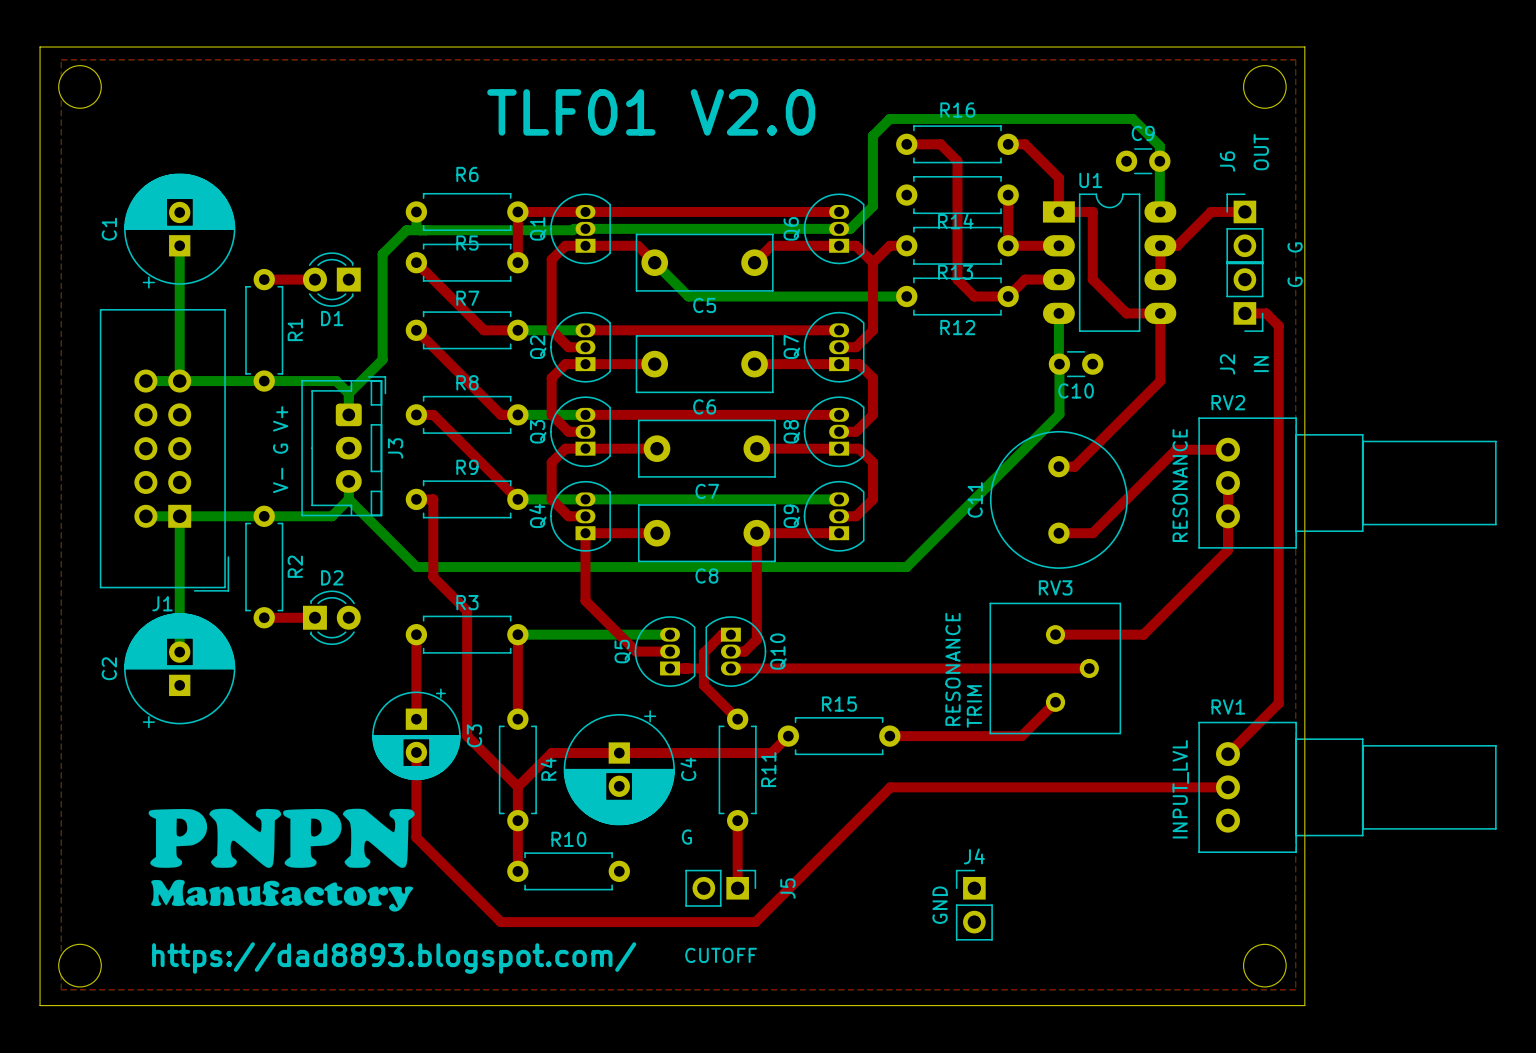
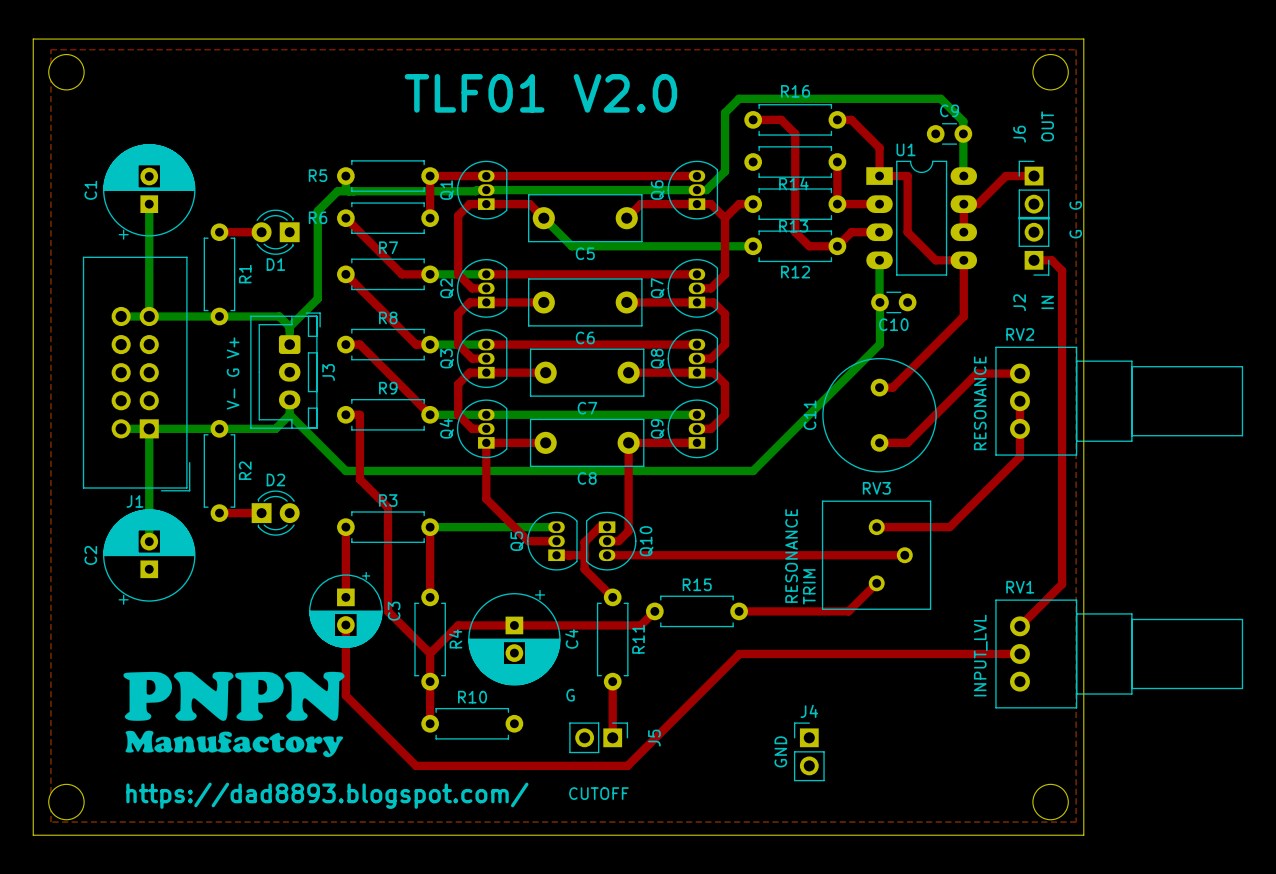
R6 name position: R6 (467, 174) -> R6 (318, 217)
R5 name position: R5 (467, 243) -> R5 (318, 175)

